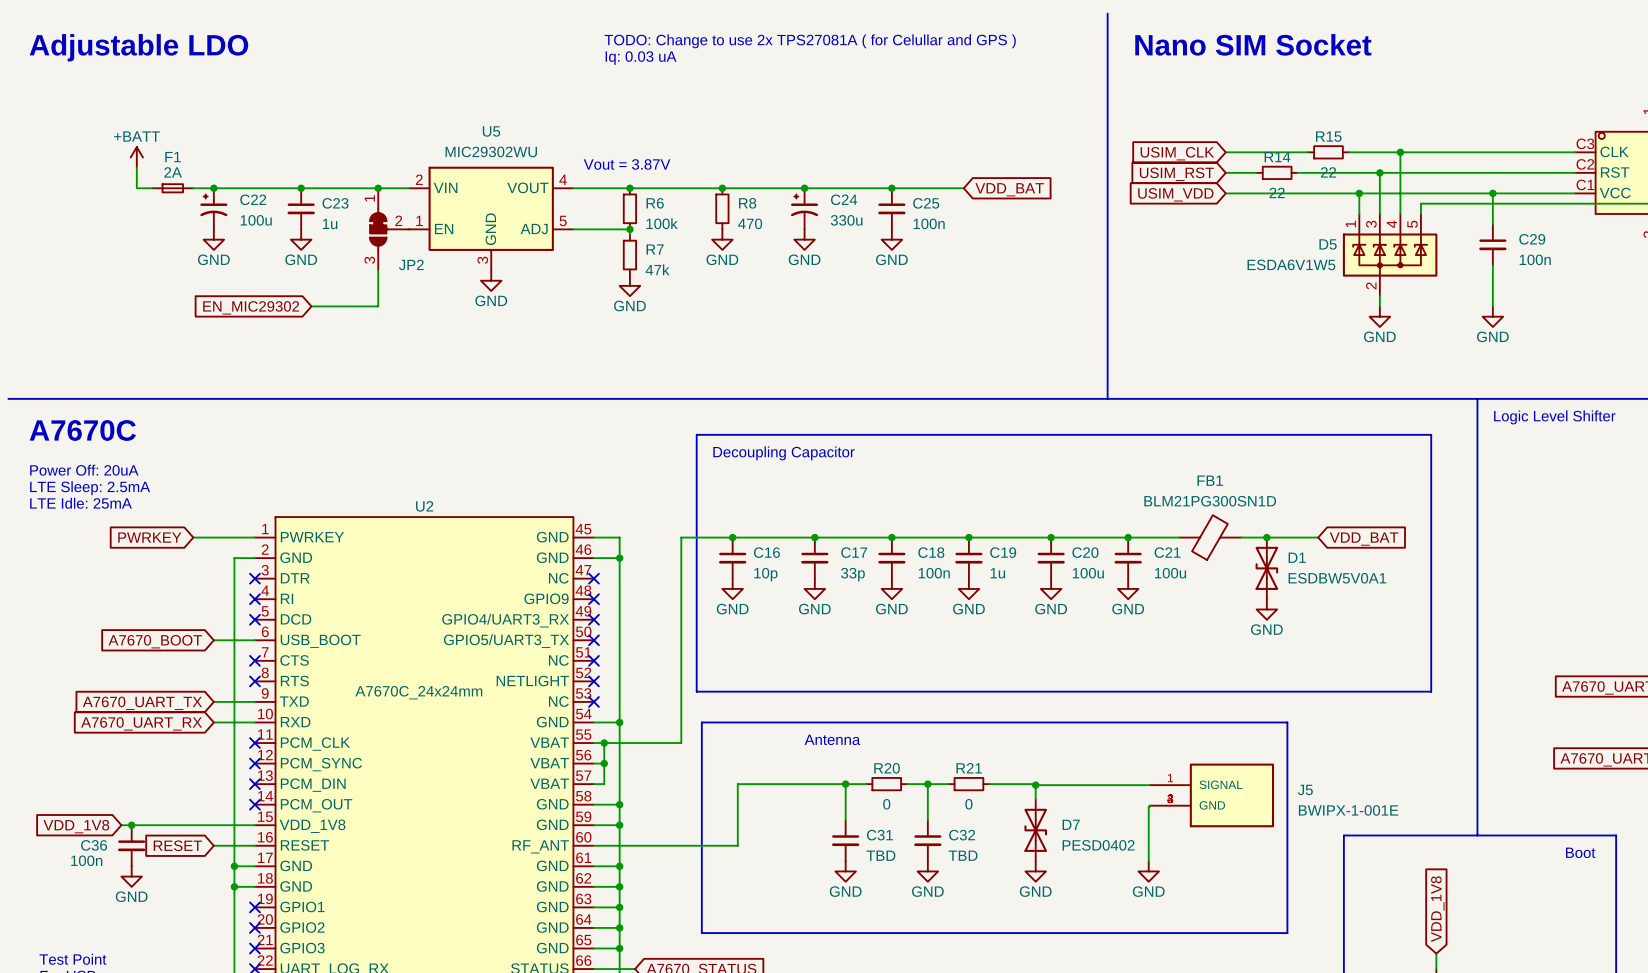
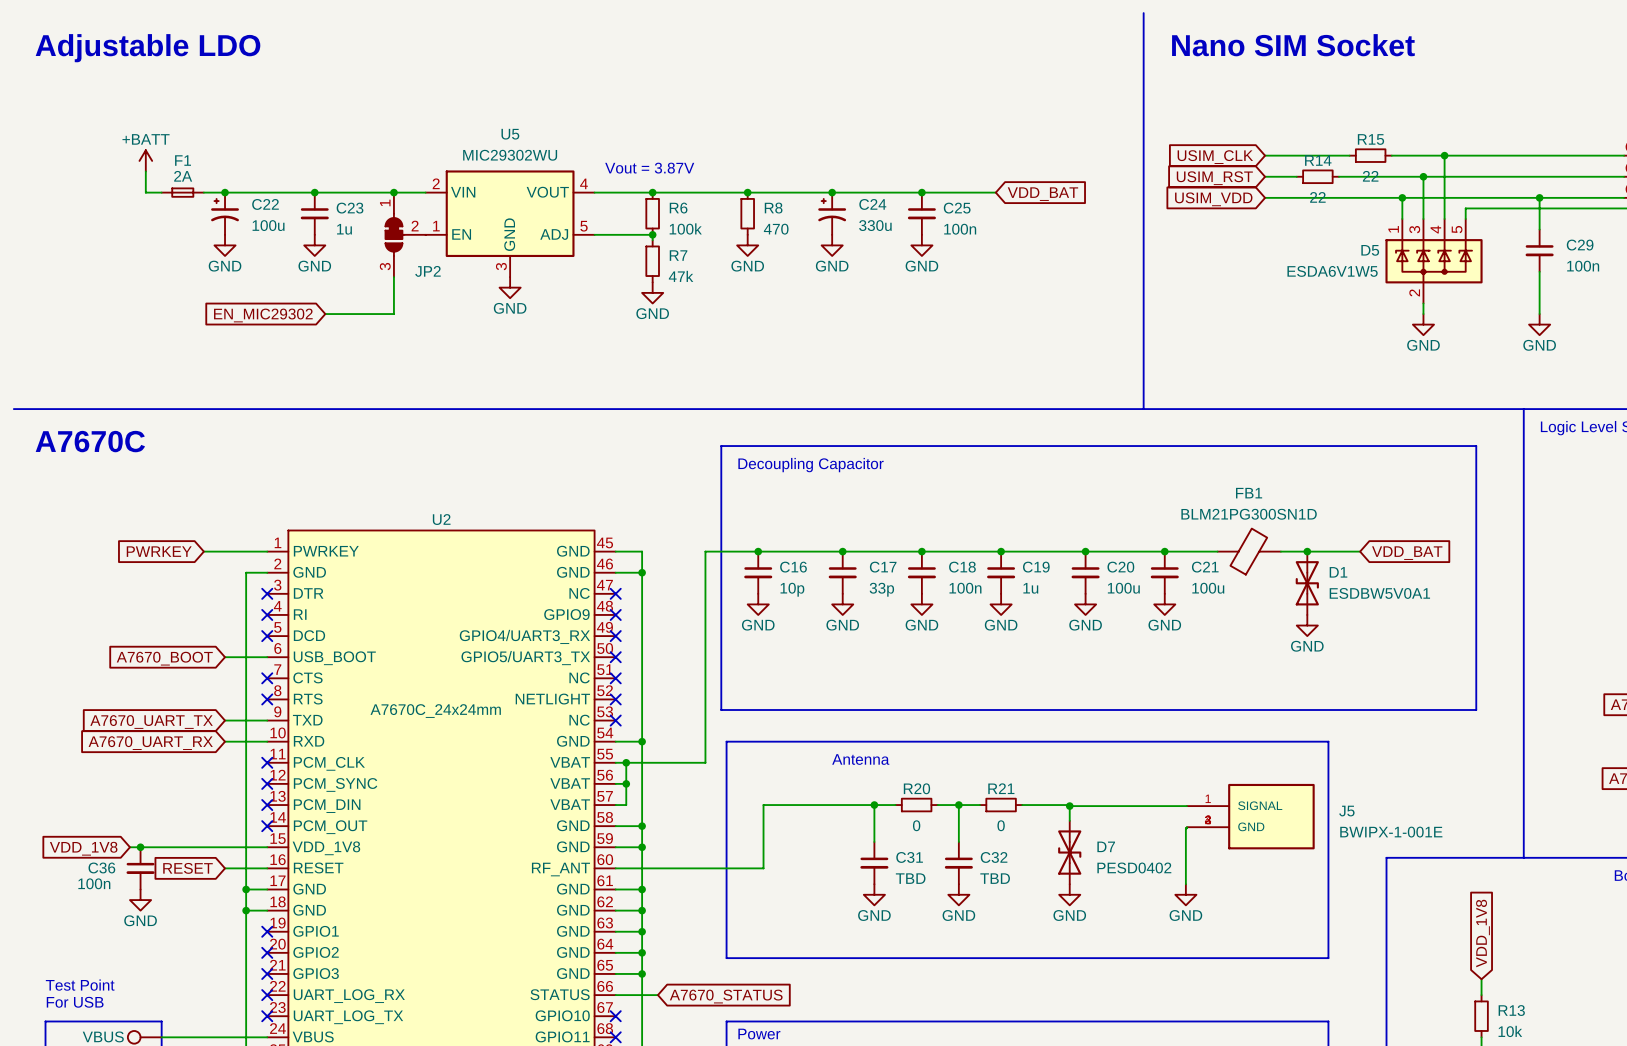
text: TODO: Change to use 2x TPS27081A ( for Celullar and GPS ) (810, 41) -> none
text: Iq: 0.03 uA (641, 58) -> none
text: Power Off: 20uA (84, 470) -> none
text: LTE Sleep: 2.5mA (90, 488) -> none
text: LTE Idle: 25mA (81, 503) -> none

